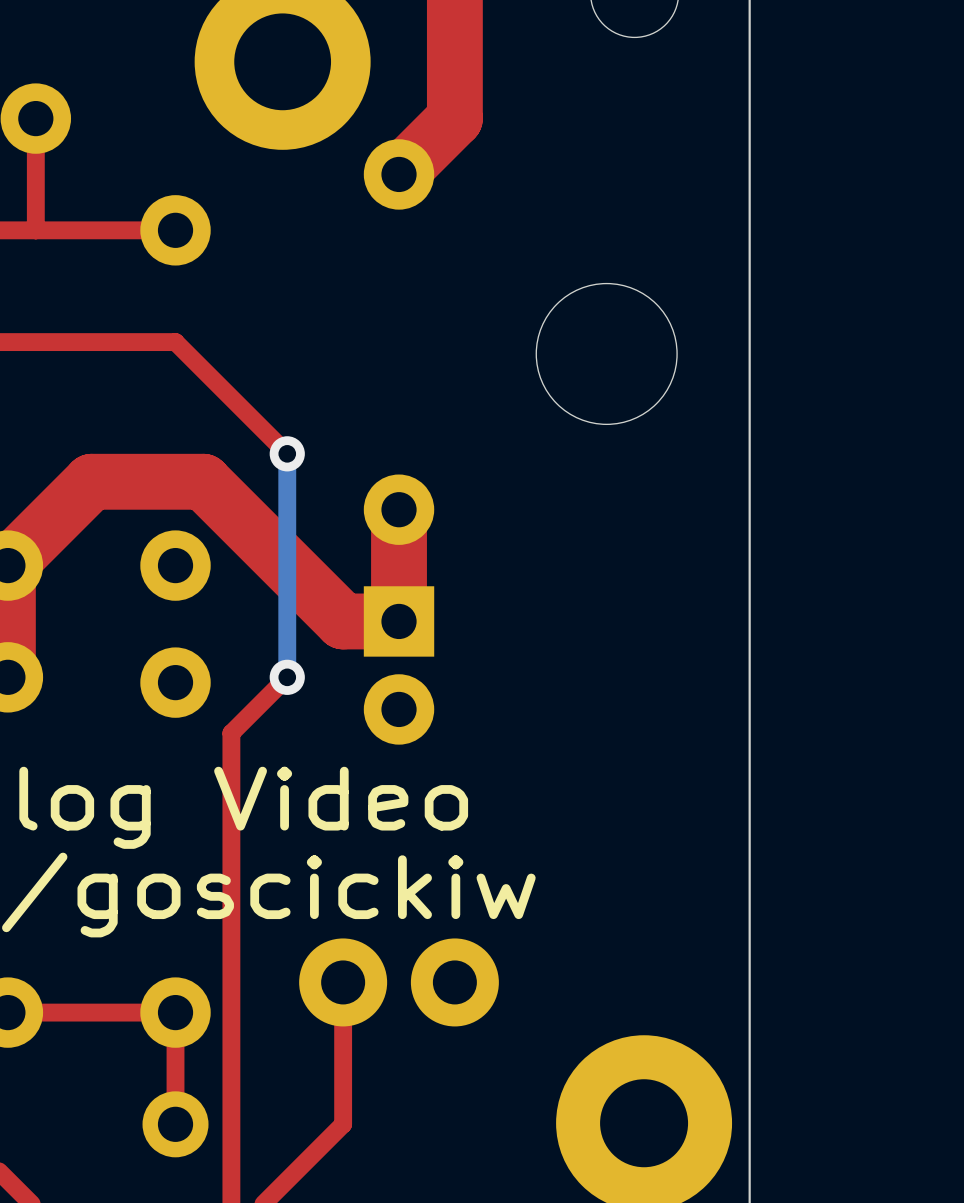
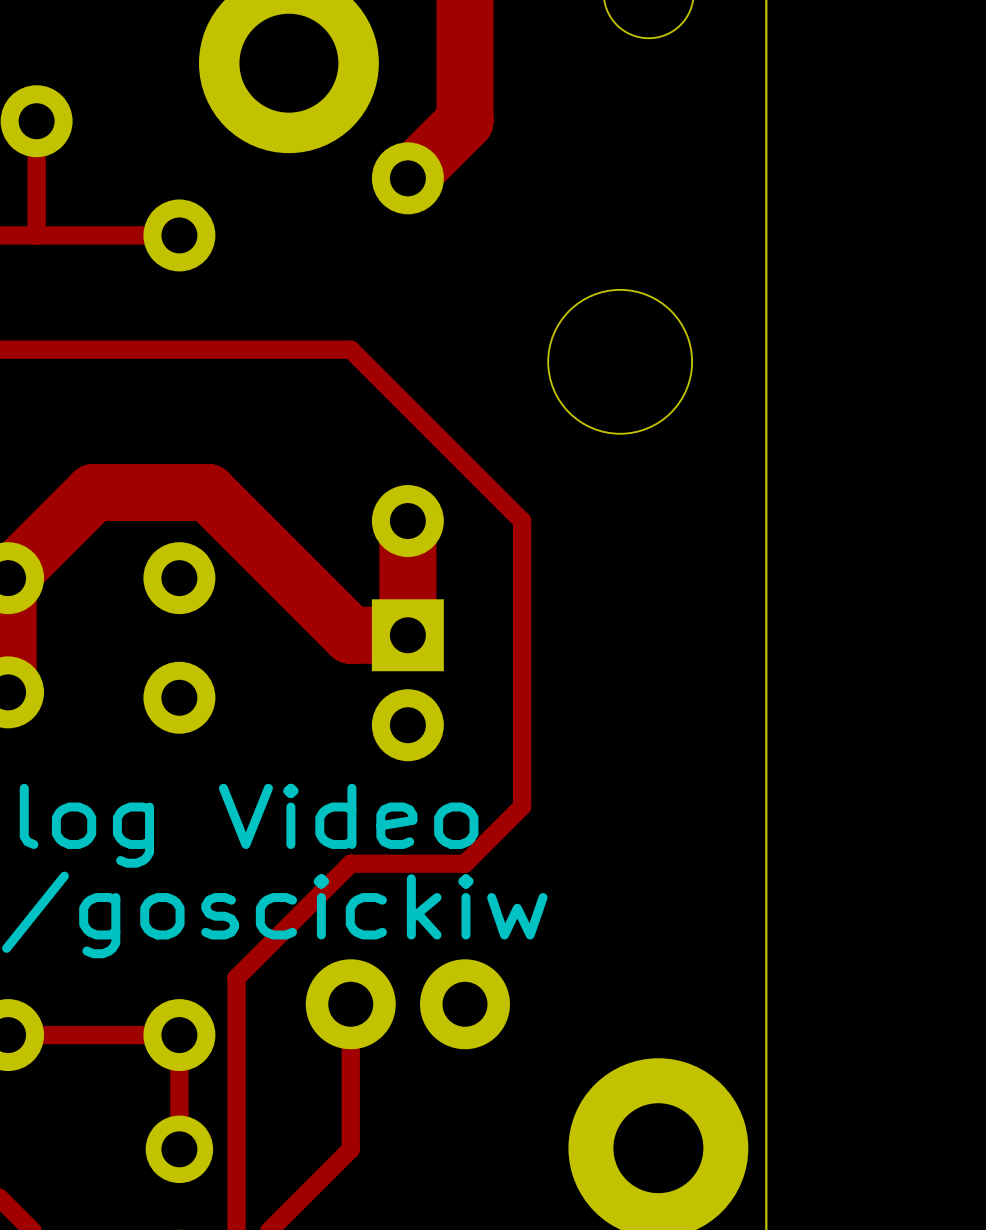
top track: (175, 342) (287, 453) -> none
bottom track: (287, 453) (287, 677) -> none
via: (287, 453) -> none
top track: (287, 677) (231, 733) (231, 956) -> (179, 349) (350, 349) (522, 521) (522, 806) (464, 863) (350, 863) (236, 977)
via: (287, 677) -> none

